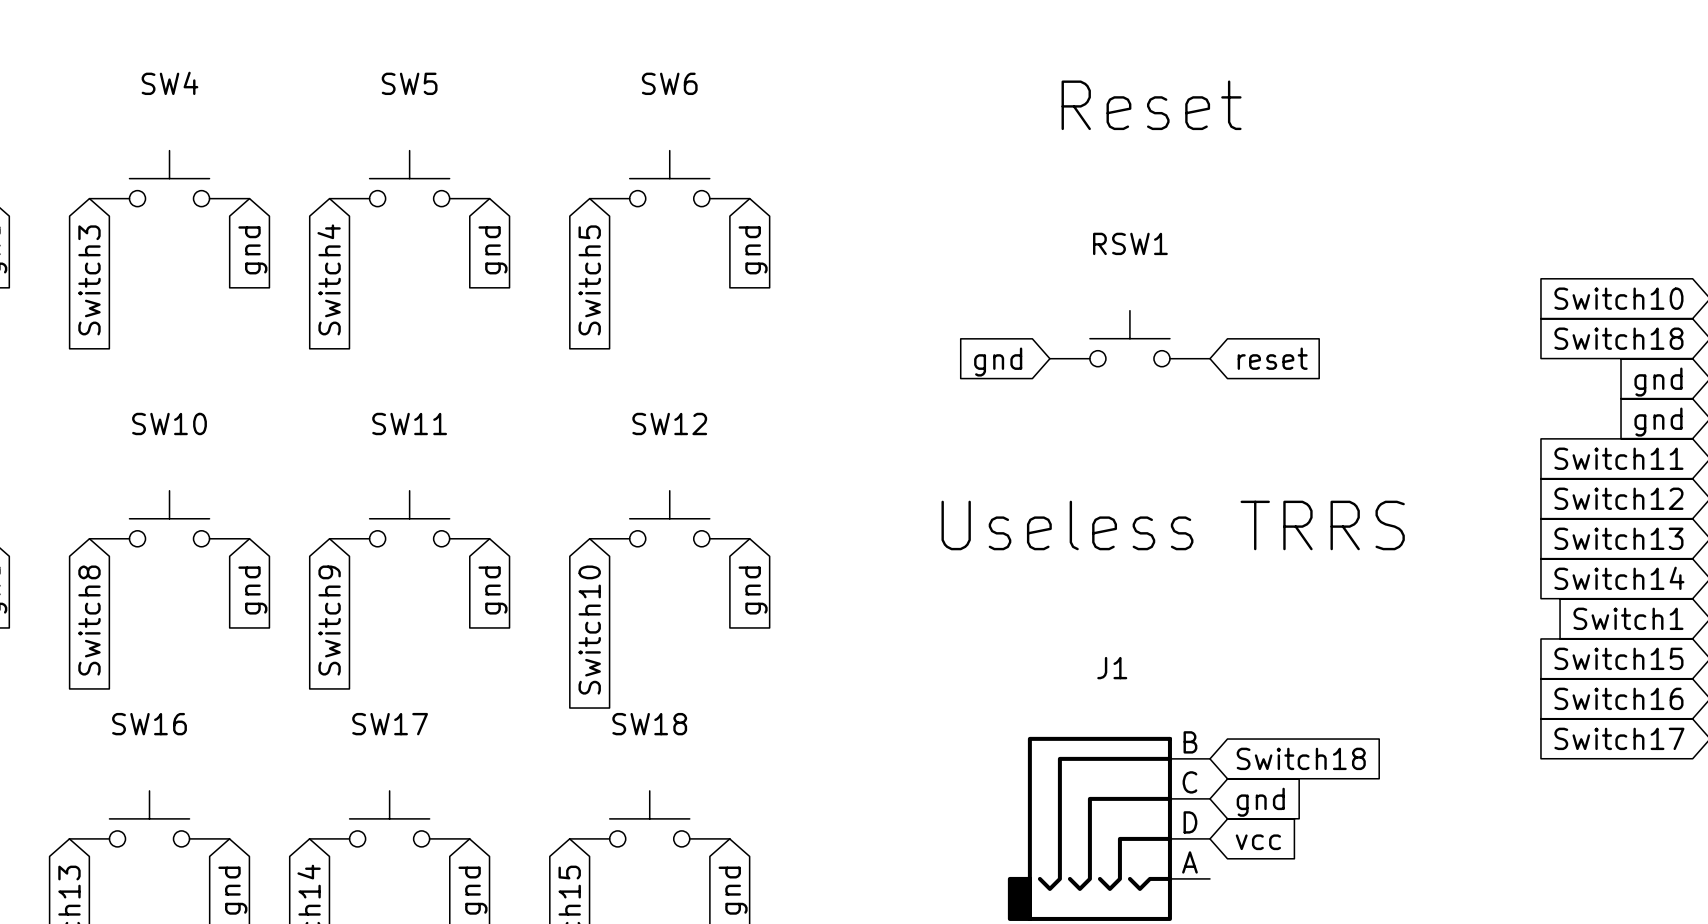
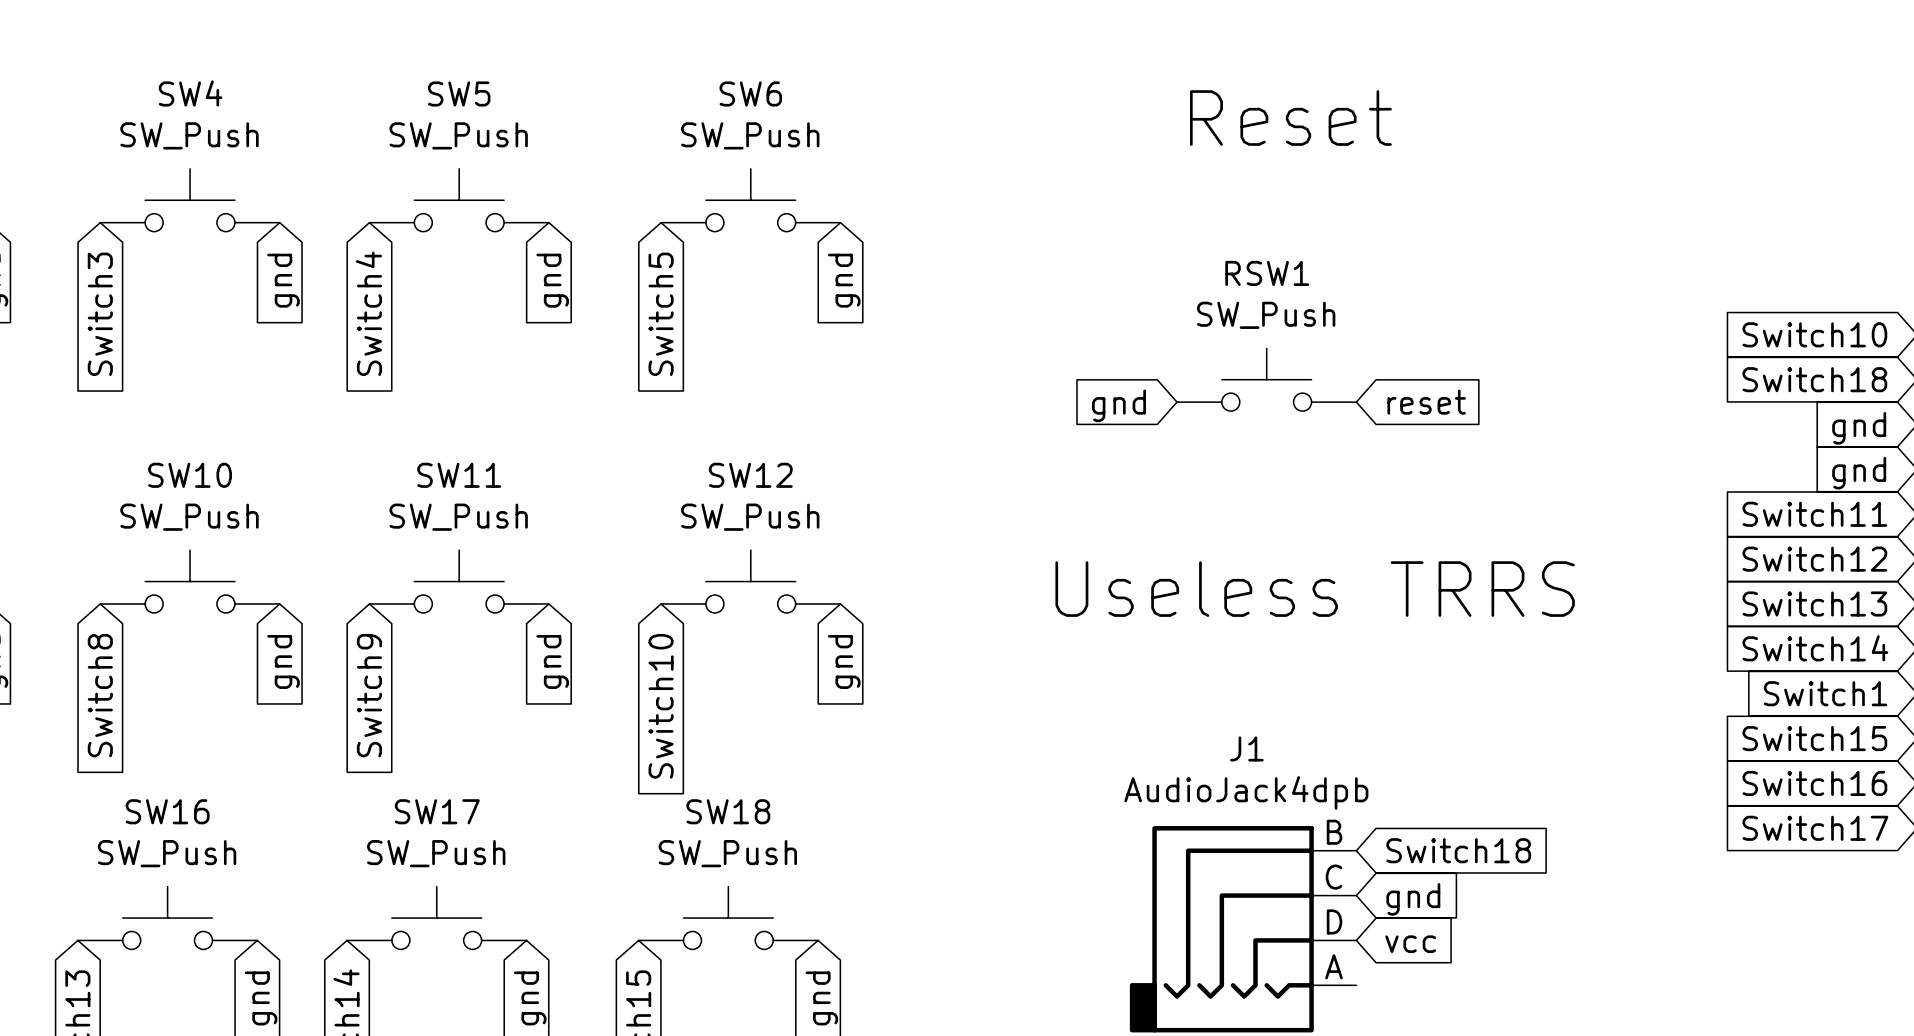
SW4 value: none -> SW_Push (189, 135)
SW5 value: none -> SW_Push (458, 135)
SW6 value: none -> SW_Push (750, 135)
RSW1 value: none -> SW_Push (1266, 315)
SW10 value: none -> SW_Push (189, 517)
SW11 value: none -> SW_Push (458, 517)
SW12 value: none -> SW_Push (750, 517)
J1 value: none -> AudioJack4dpb (1246, 792)
SW16 value: none -> SW_Push (167, 853)
SW17 value: none -> SW_Push (436, 853)
SW18 value: none -> SW_Push (727, 853)

